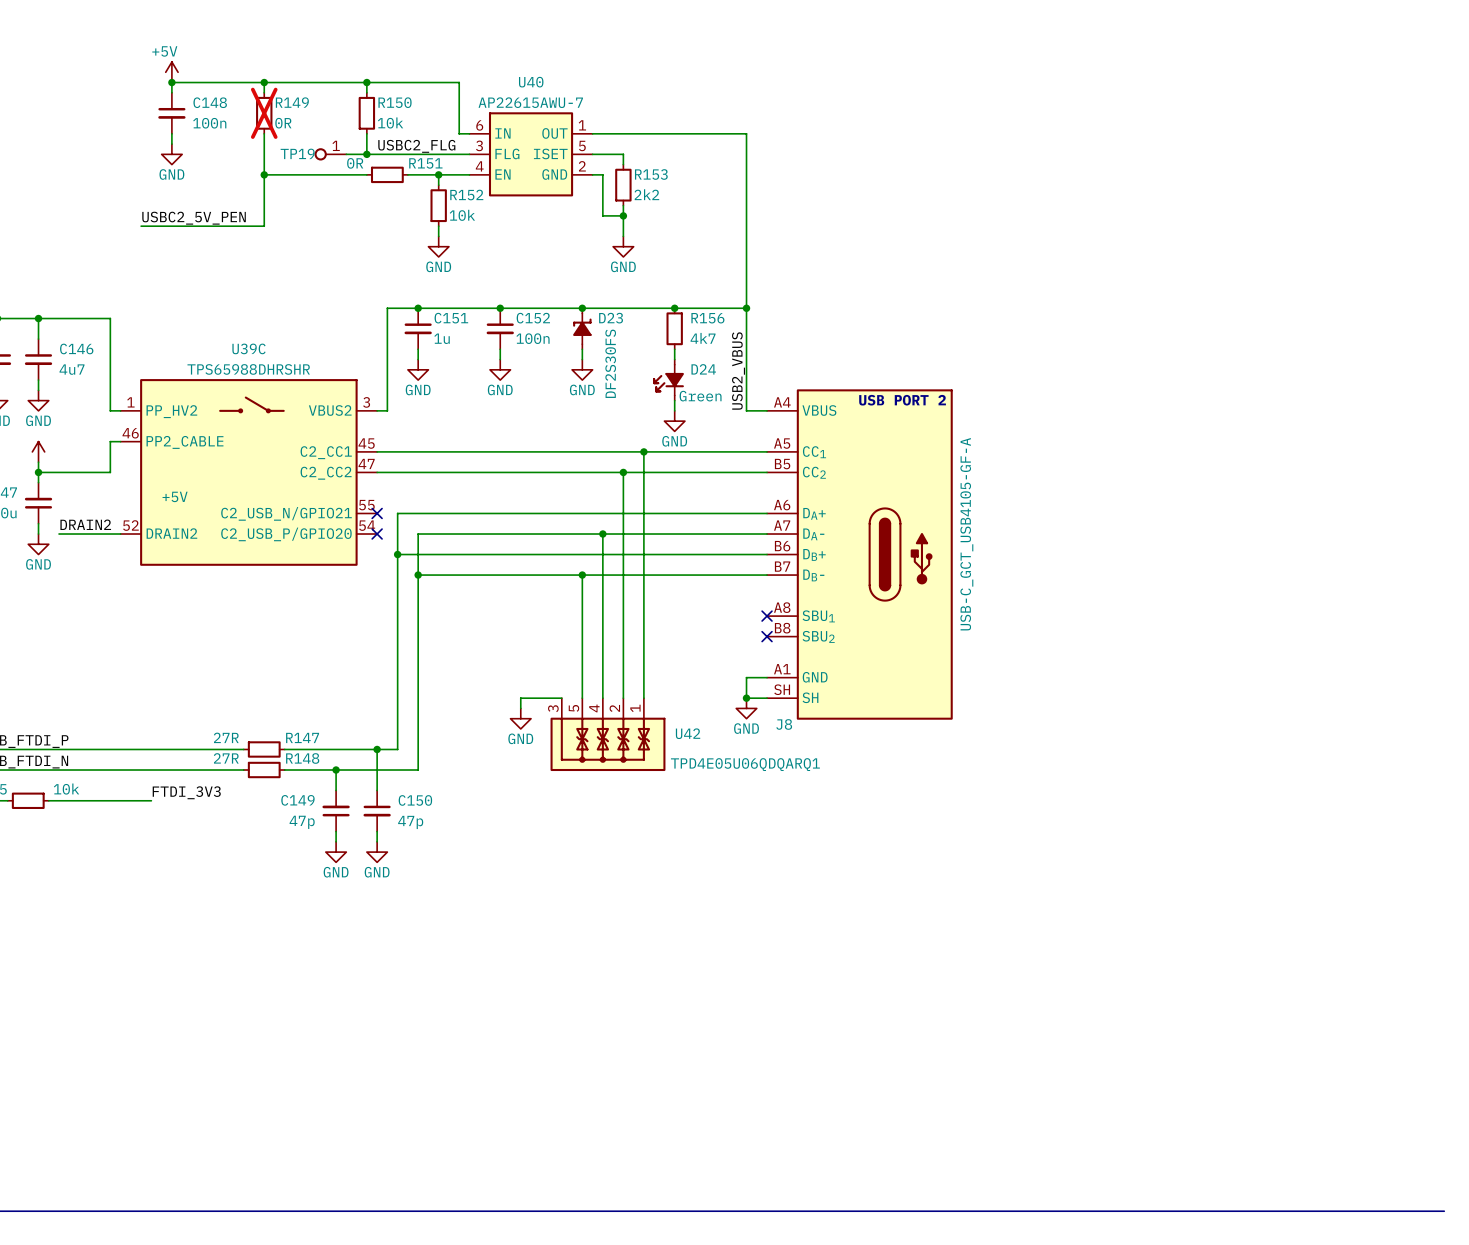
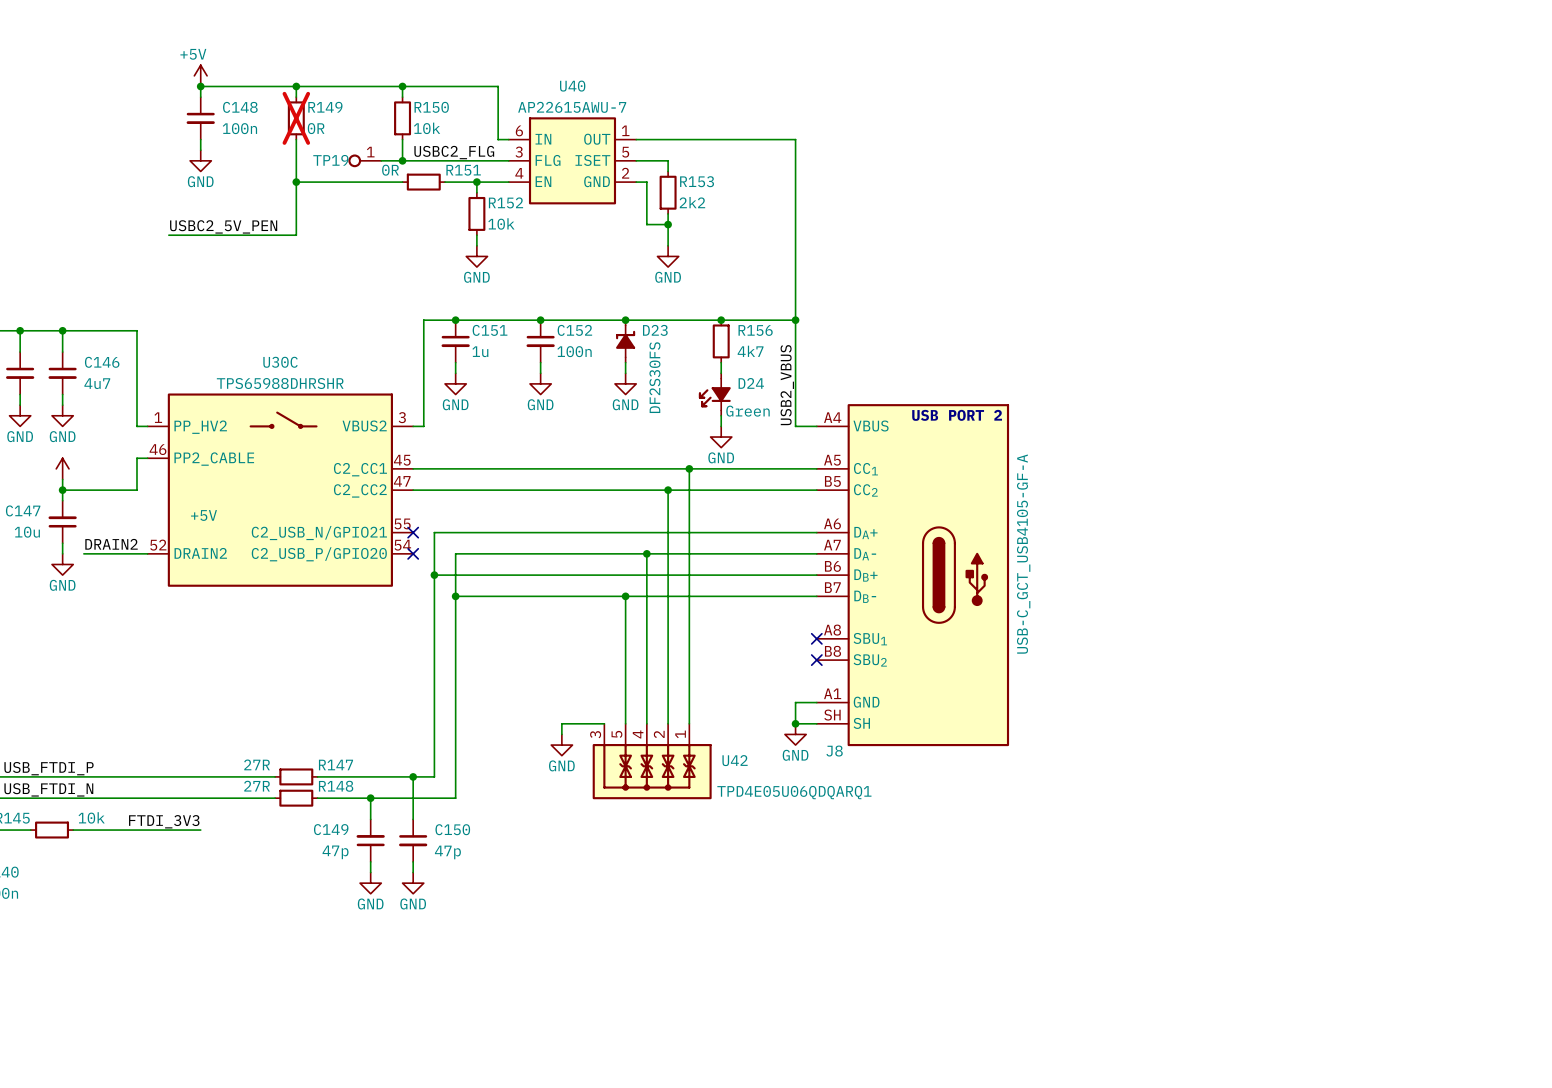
U39C name: U39C (248, 348) -> U30C (280, 362)
label position: FTDI_3V3 (186, 792) -> FTDI_3V3 (164, 821)
wire: none -> (179, 830) (200, 830)

